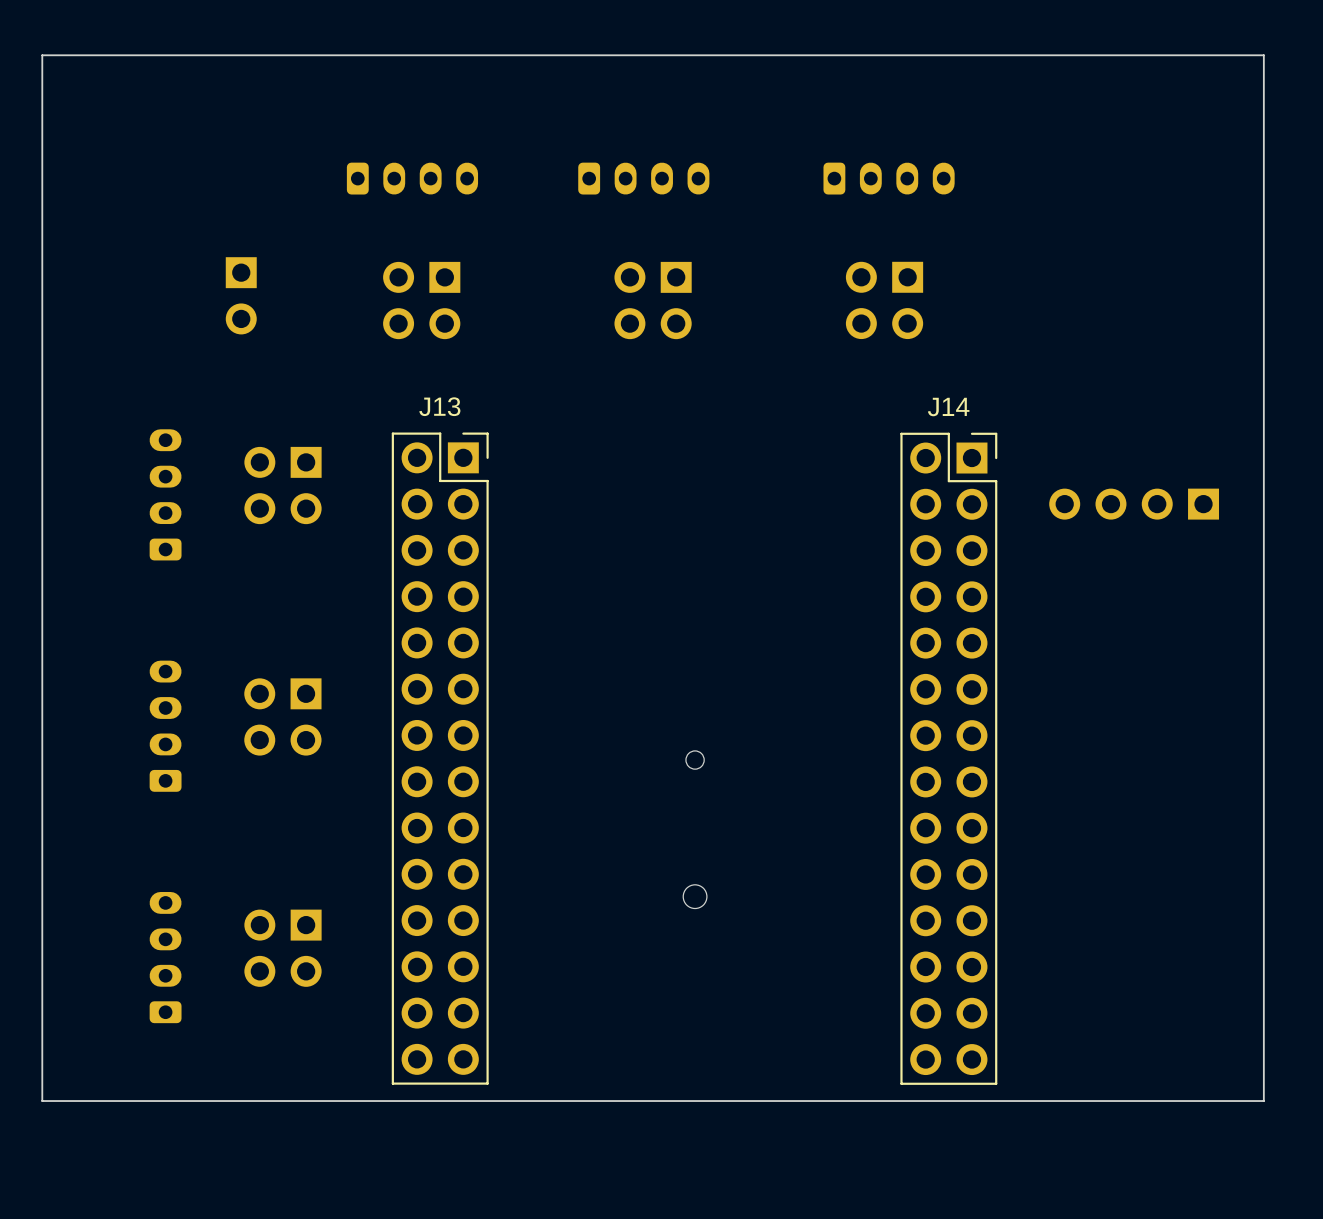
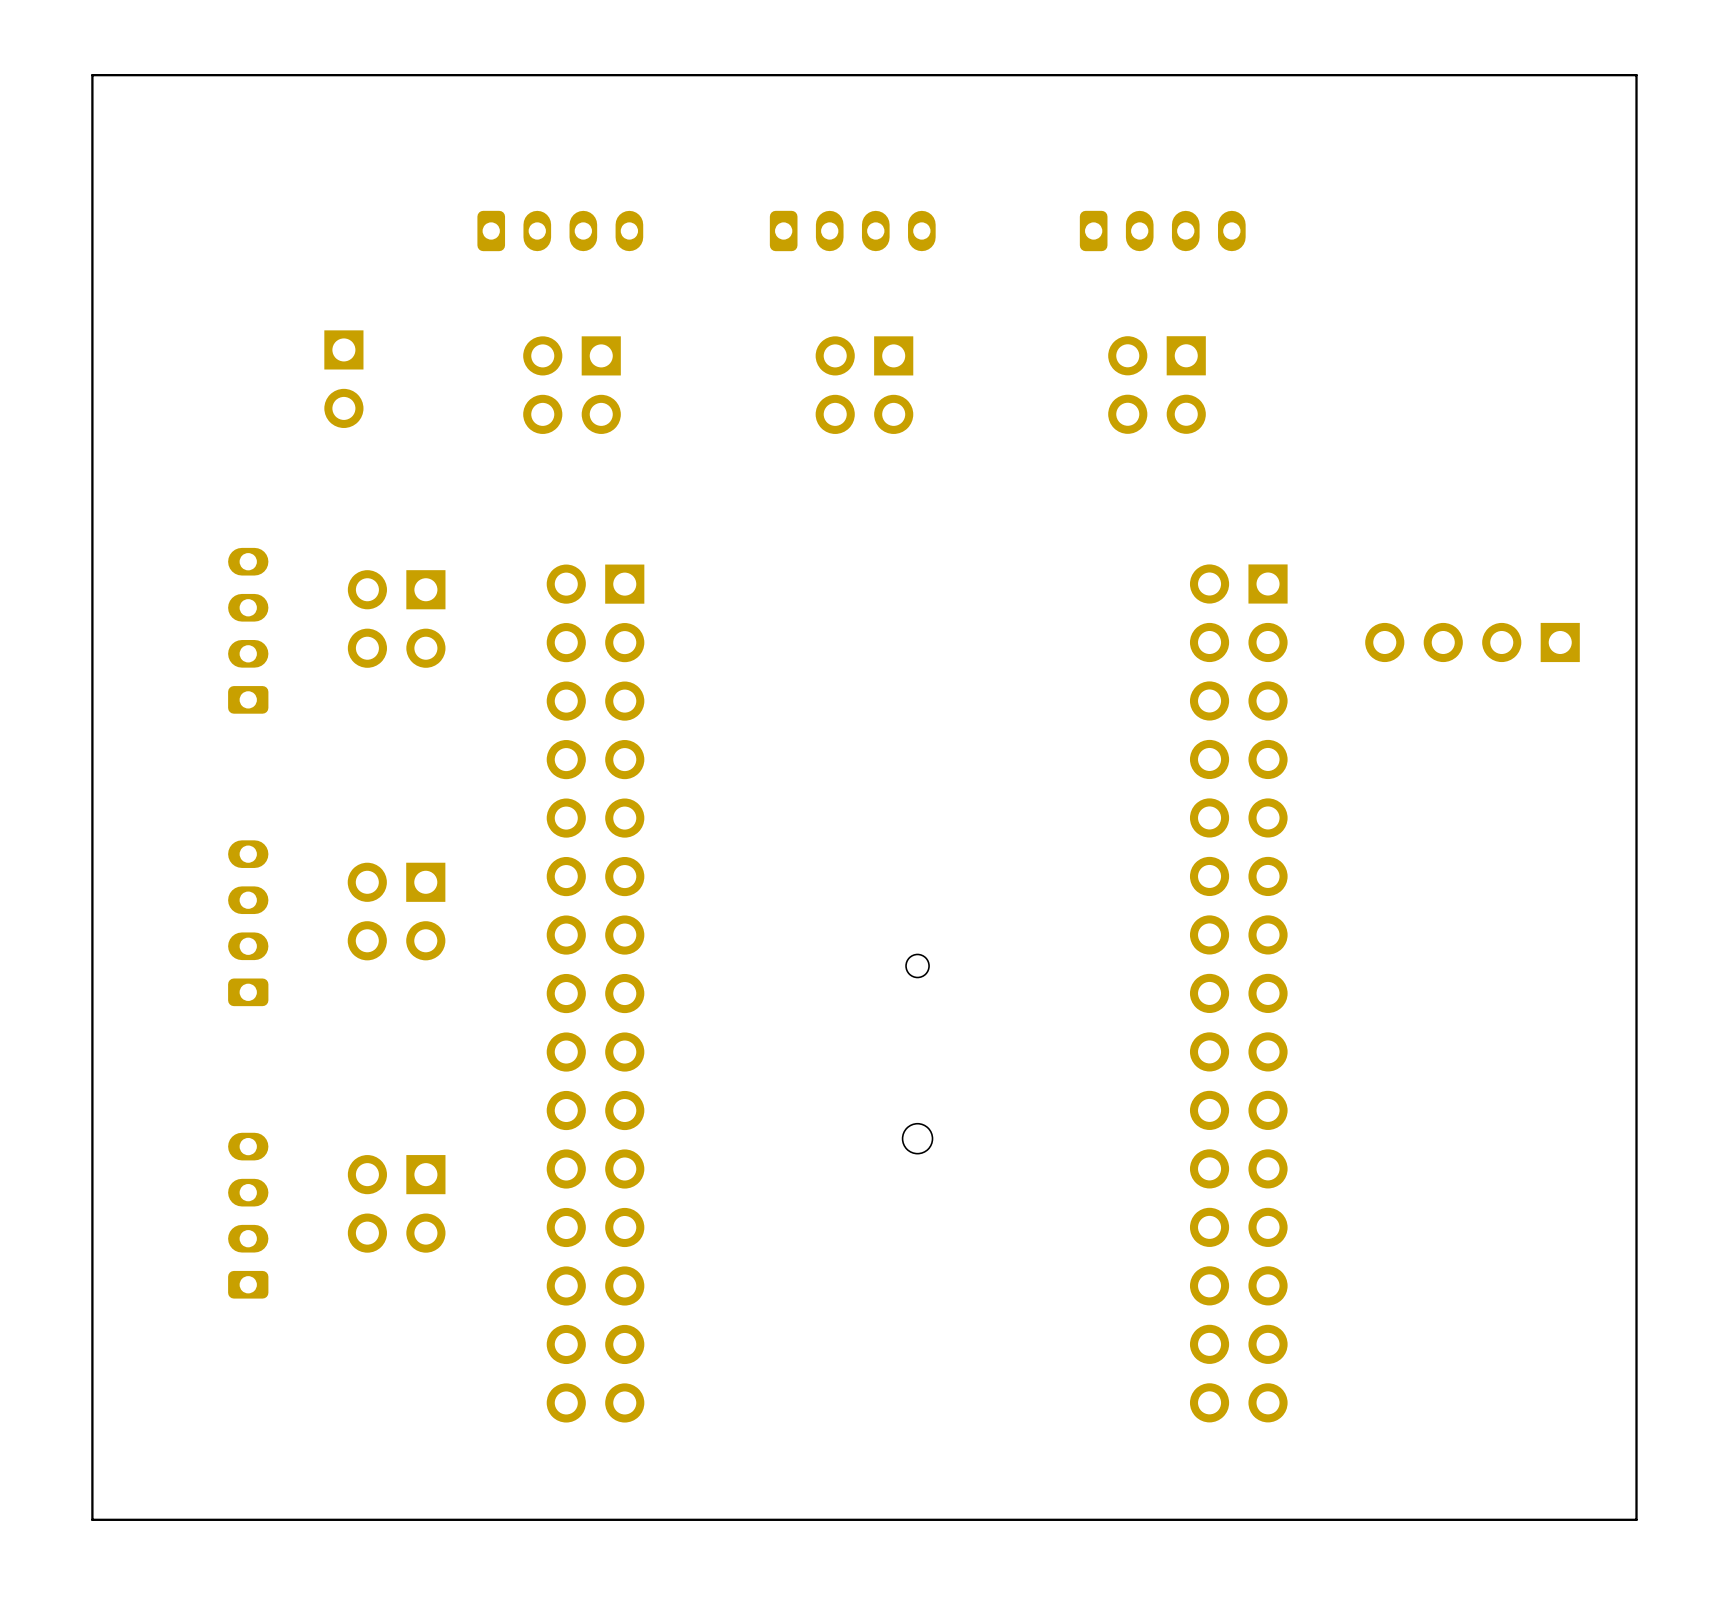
J13: (440, 758) -> none
J14: (948, 758) -> none
part: none -> (595, 993)
part: none -> (1238, 993)
board edge: (1263, 1101) (42, 1101) -> (1636, 1396) (1636, 1519) (92, 1519) (92, 1396)

